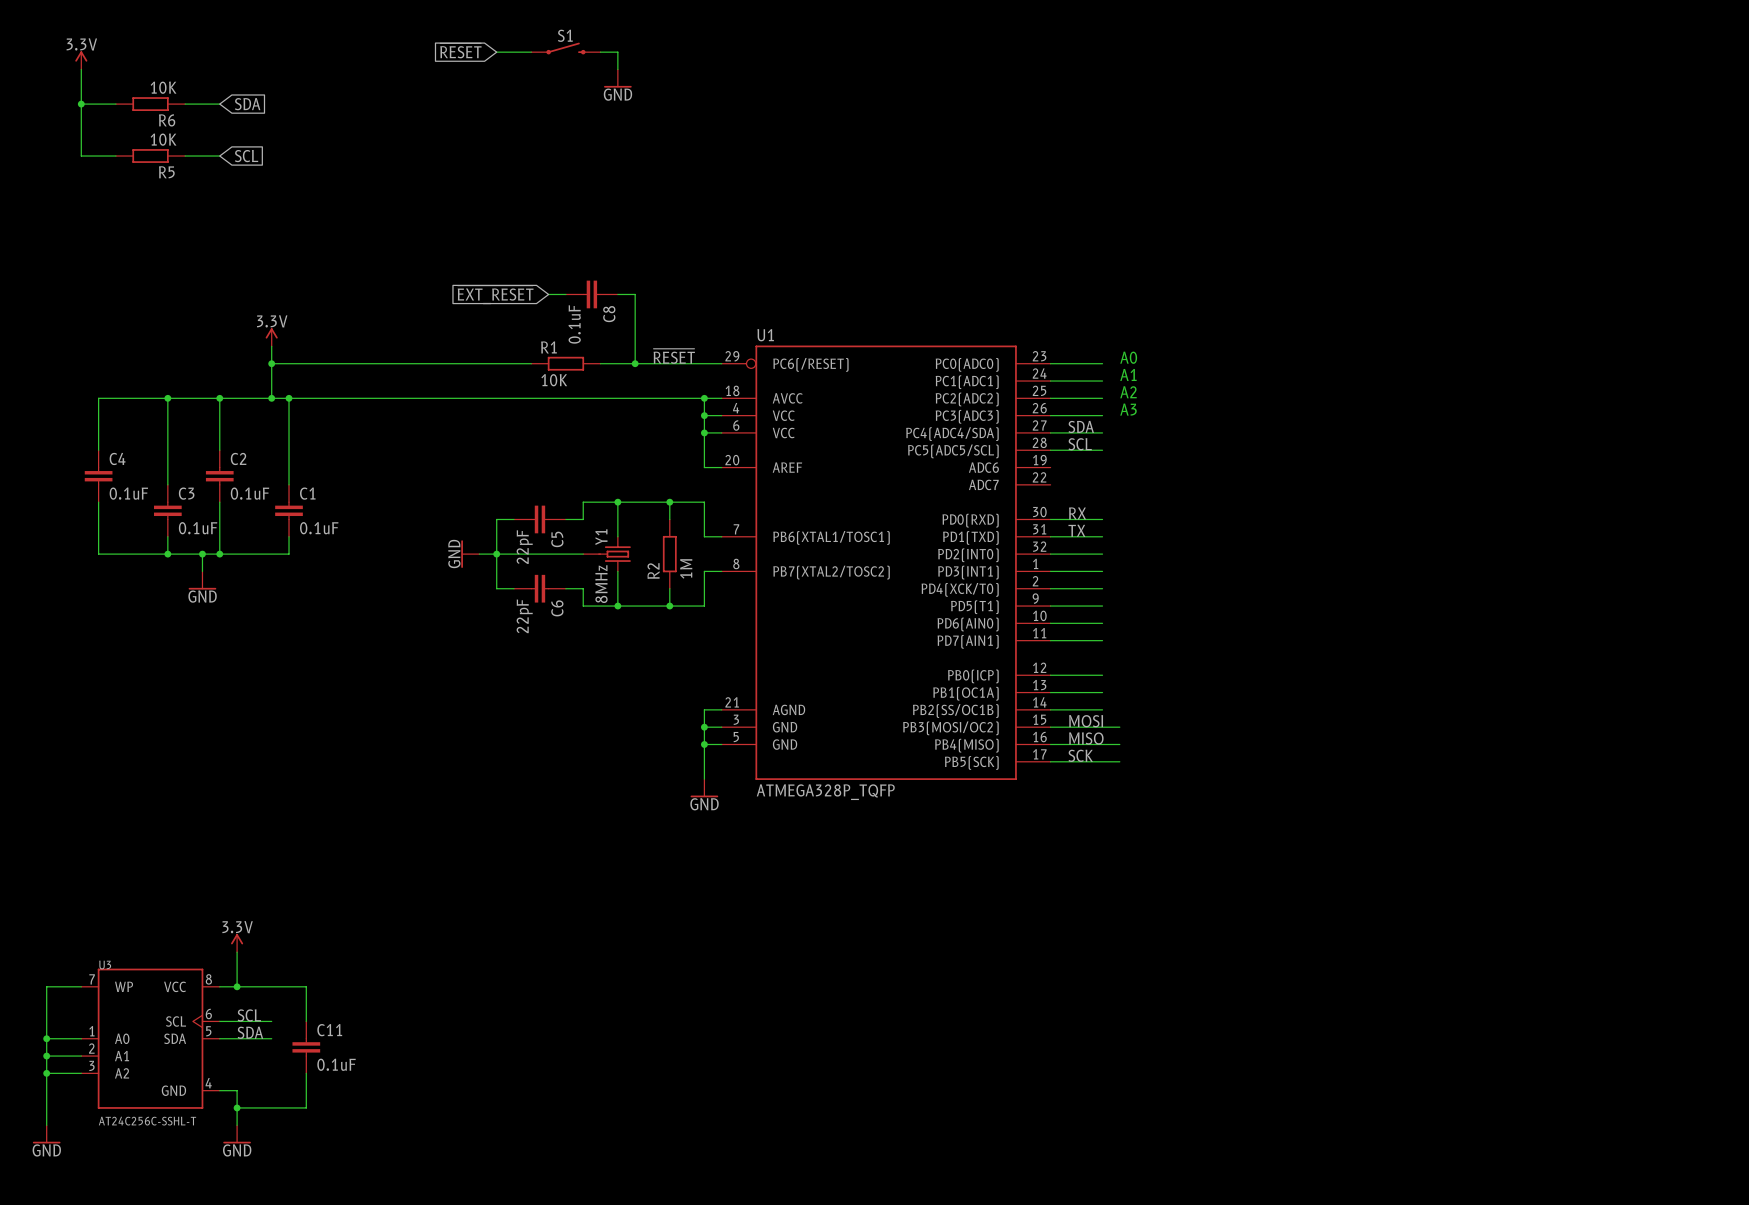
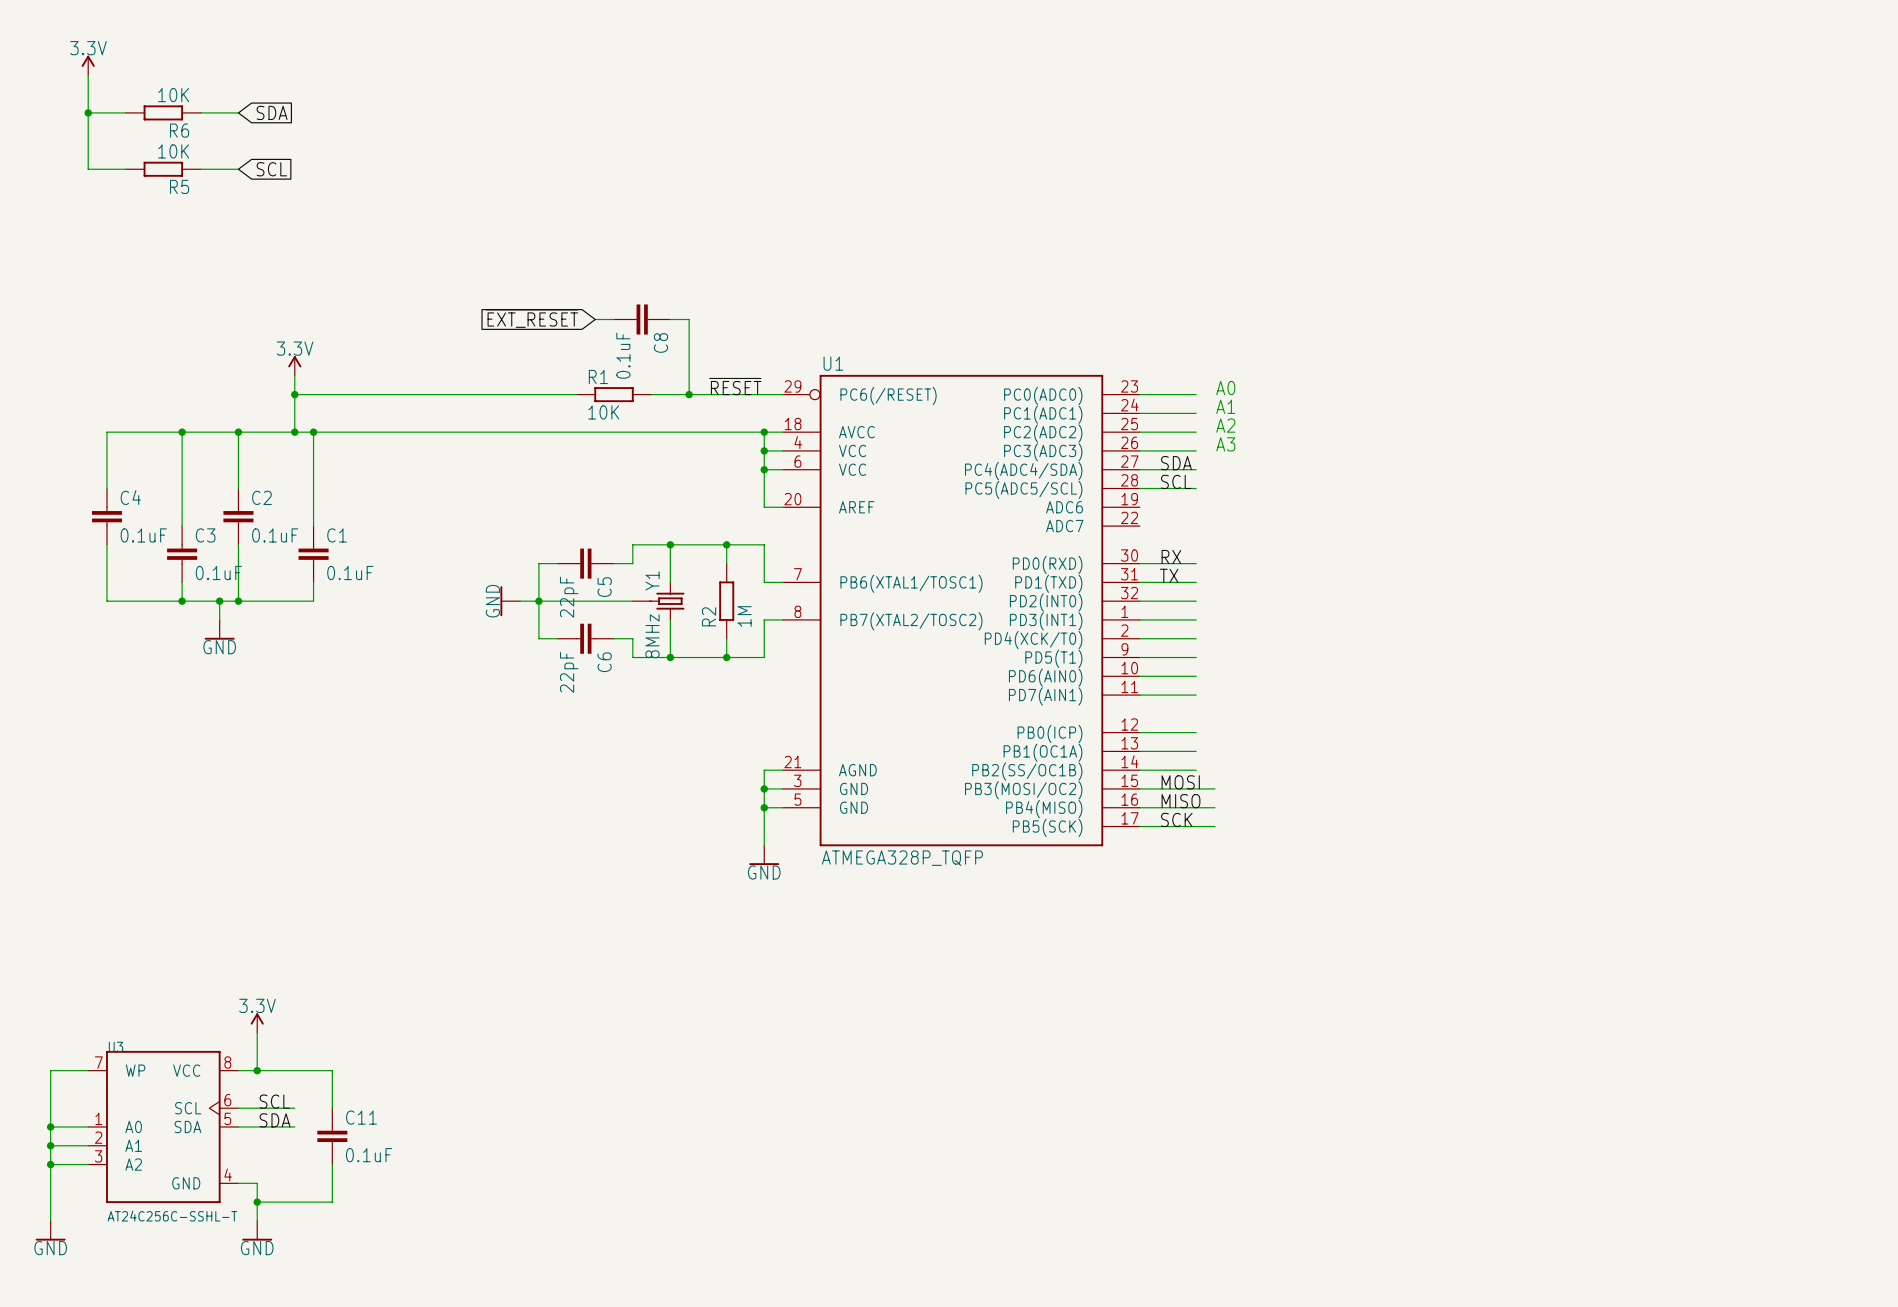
S1: (565, 48) -> none
global label: ~{RESET} (460, 50) -> none
wire: (496, 52) (531, 52) -> none
wire: (600, 52) (617, 52) (617, 69) -> none
power symbol: GND (617, 78) -> none

